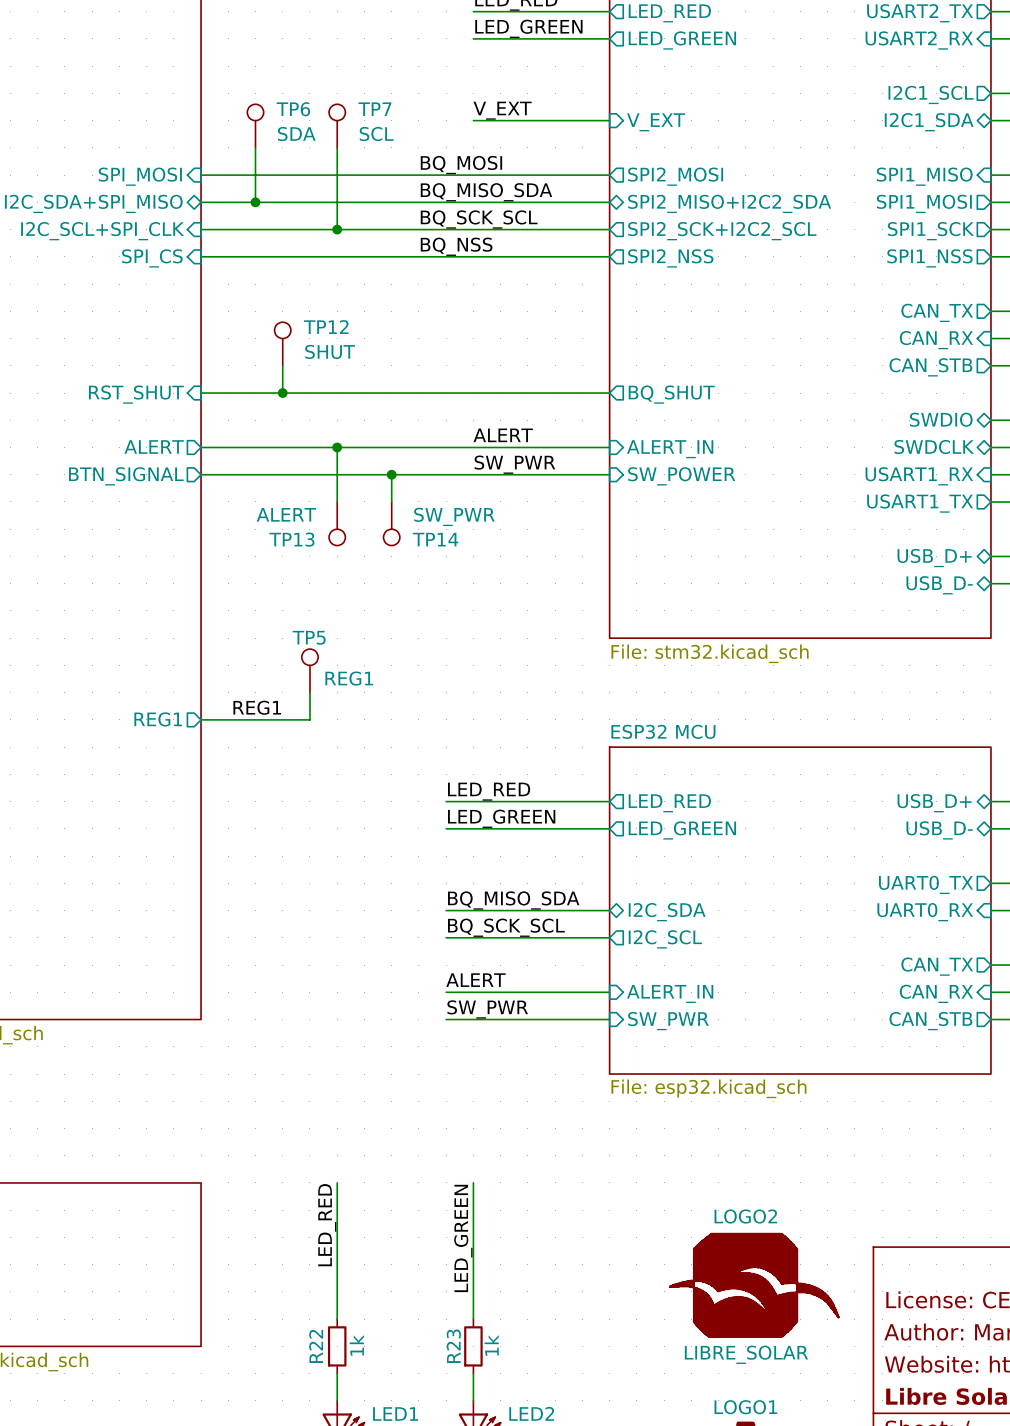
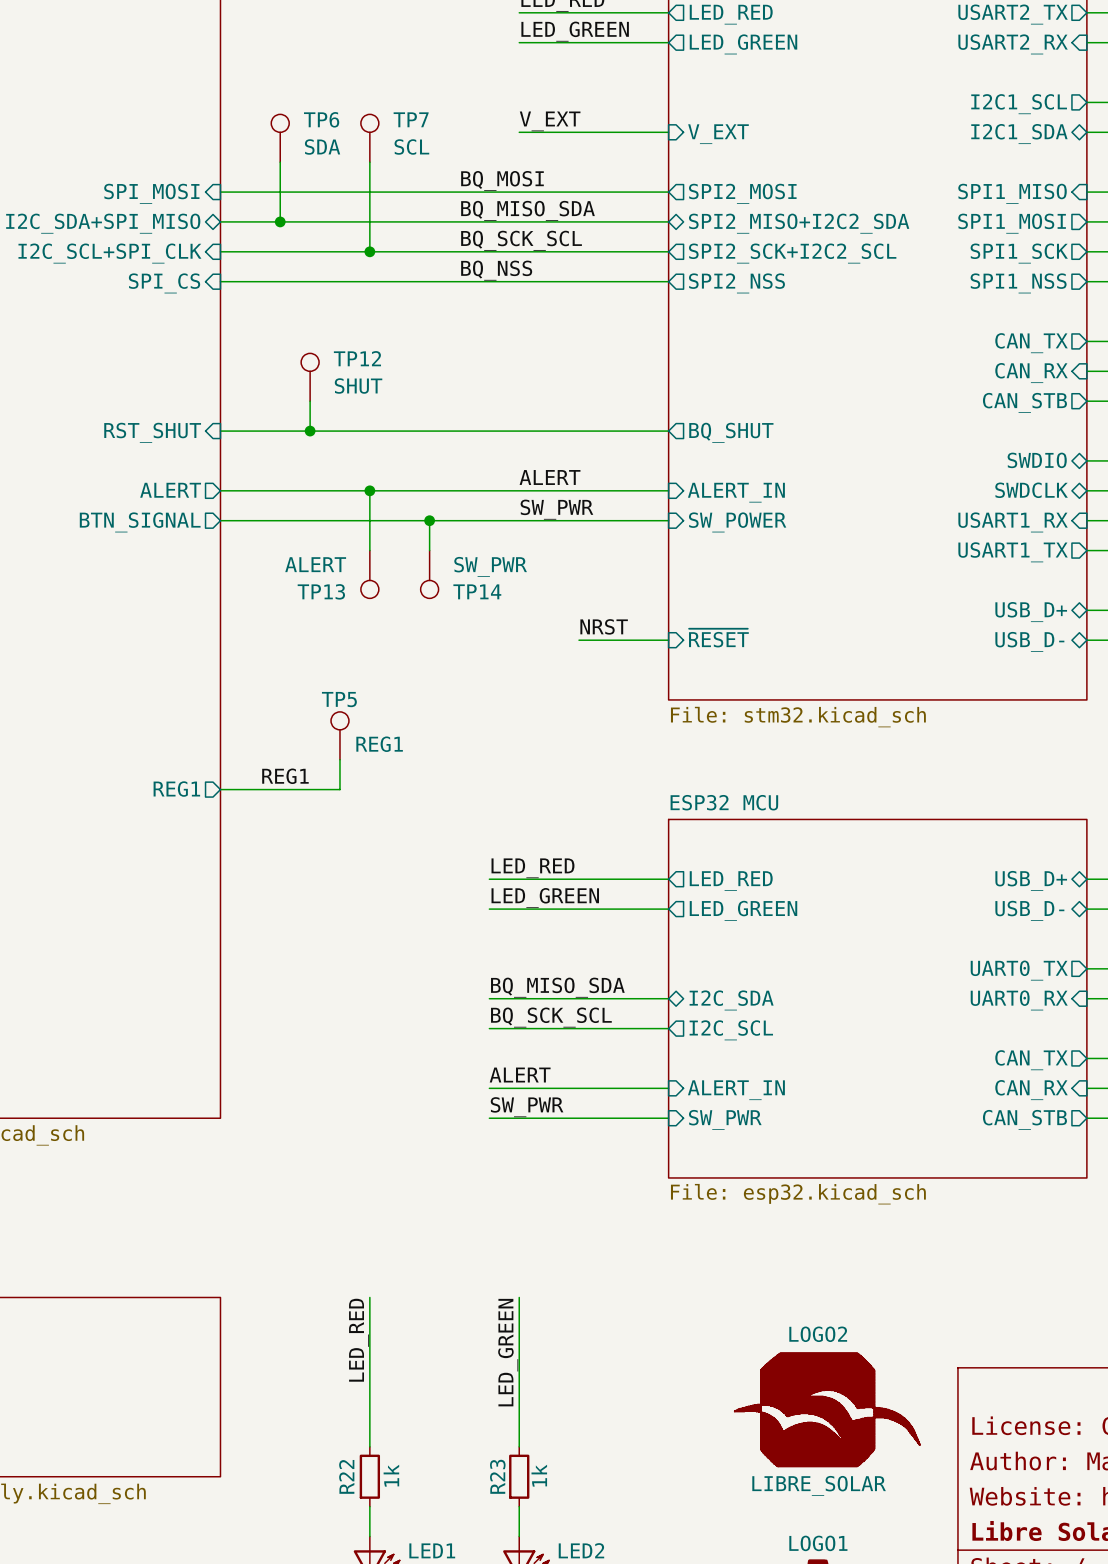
label: none -> NRST (604, 626)
sheet pin: none -> ~{RESET} (718, 638)
wire: none -> (578, 640) (668, 640)

